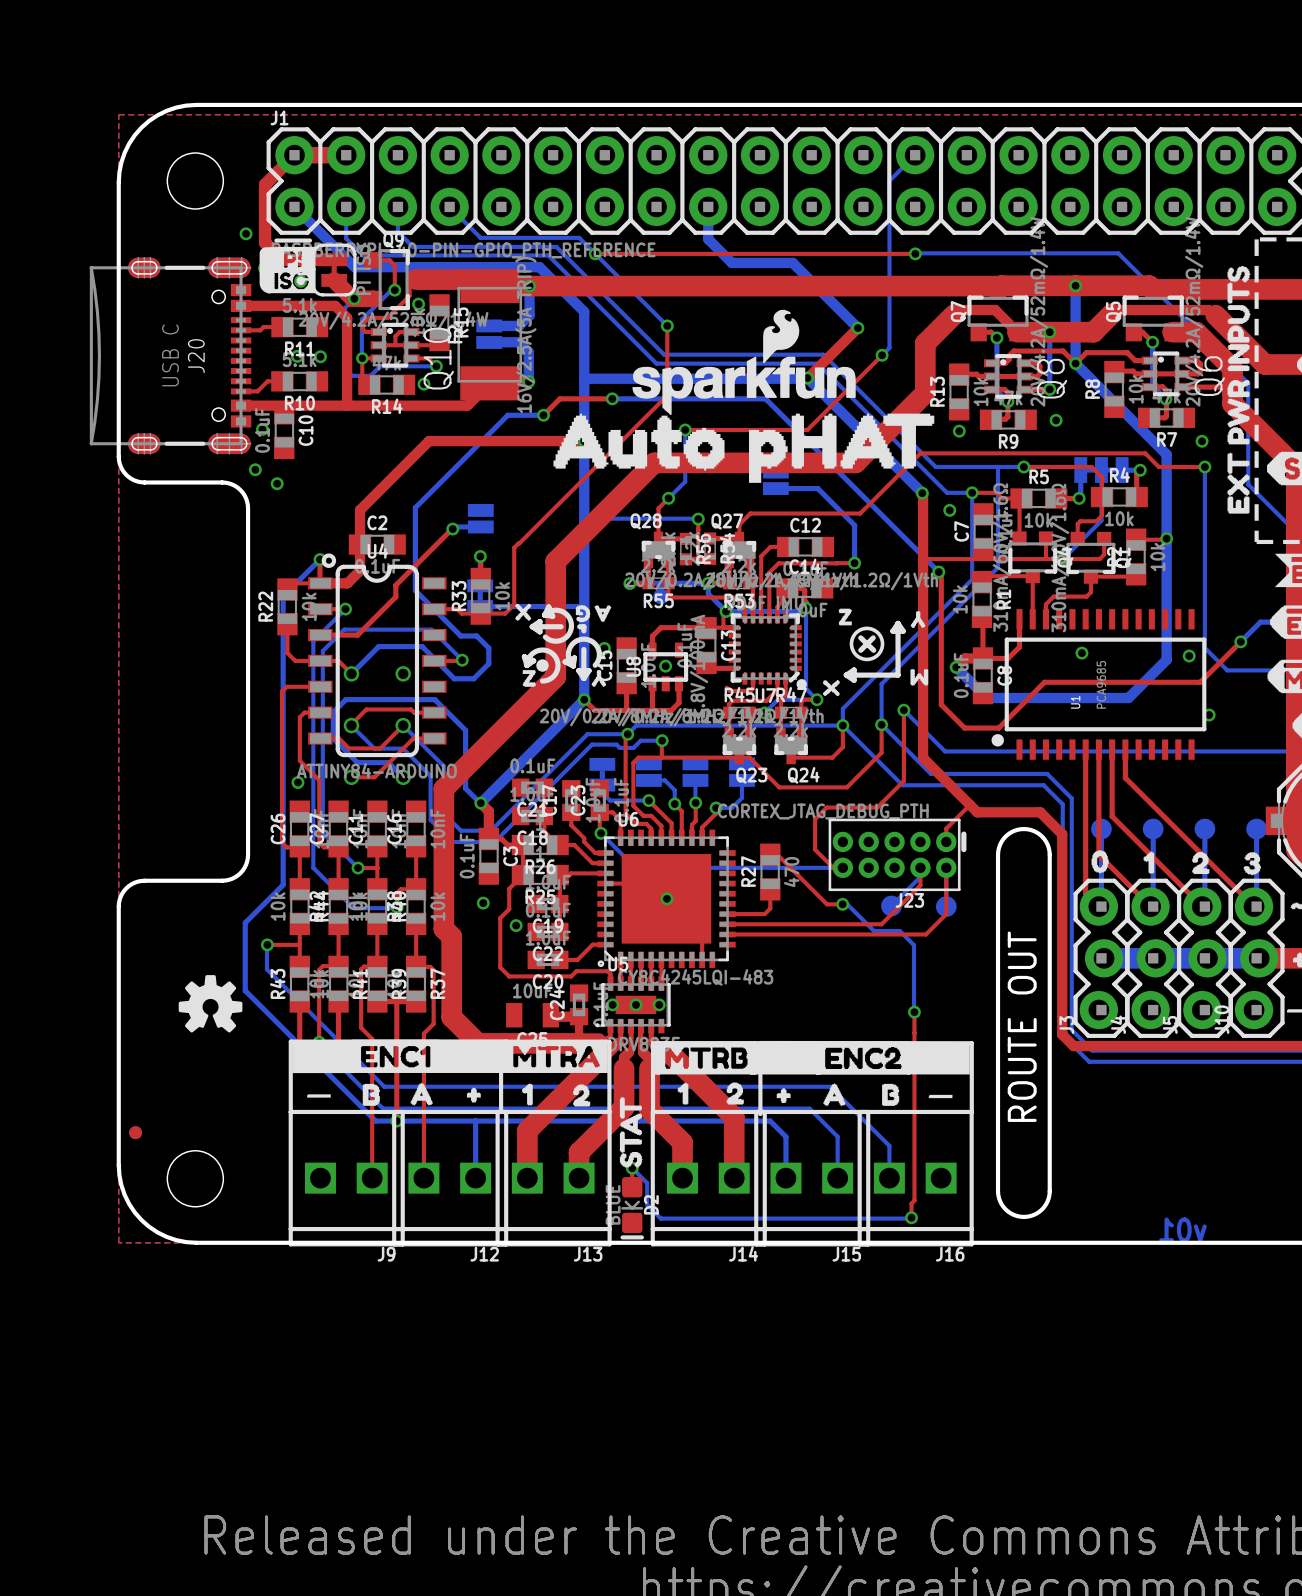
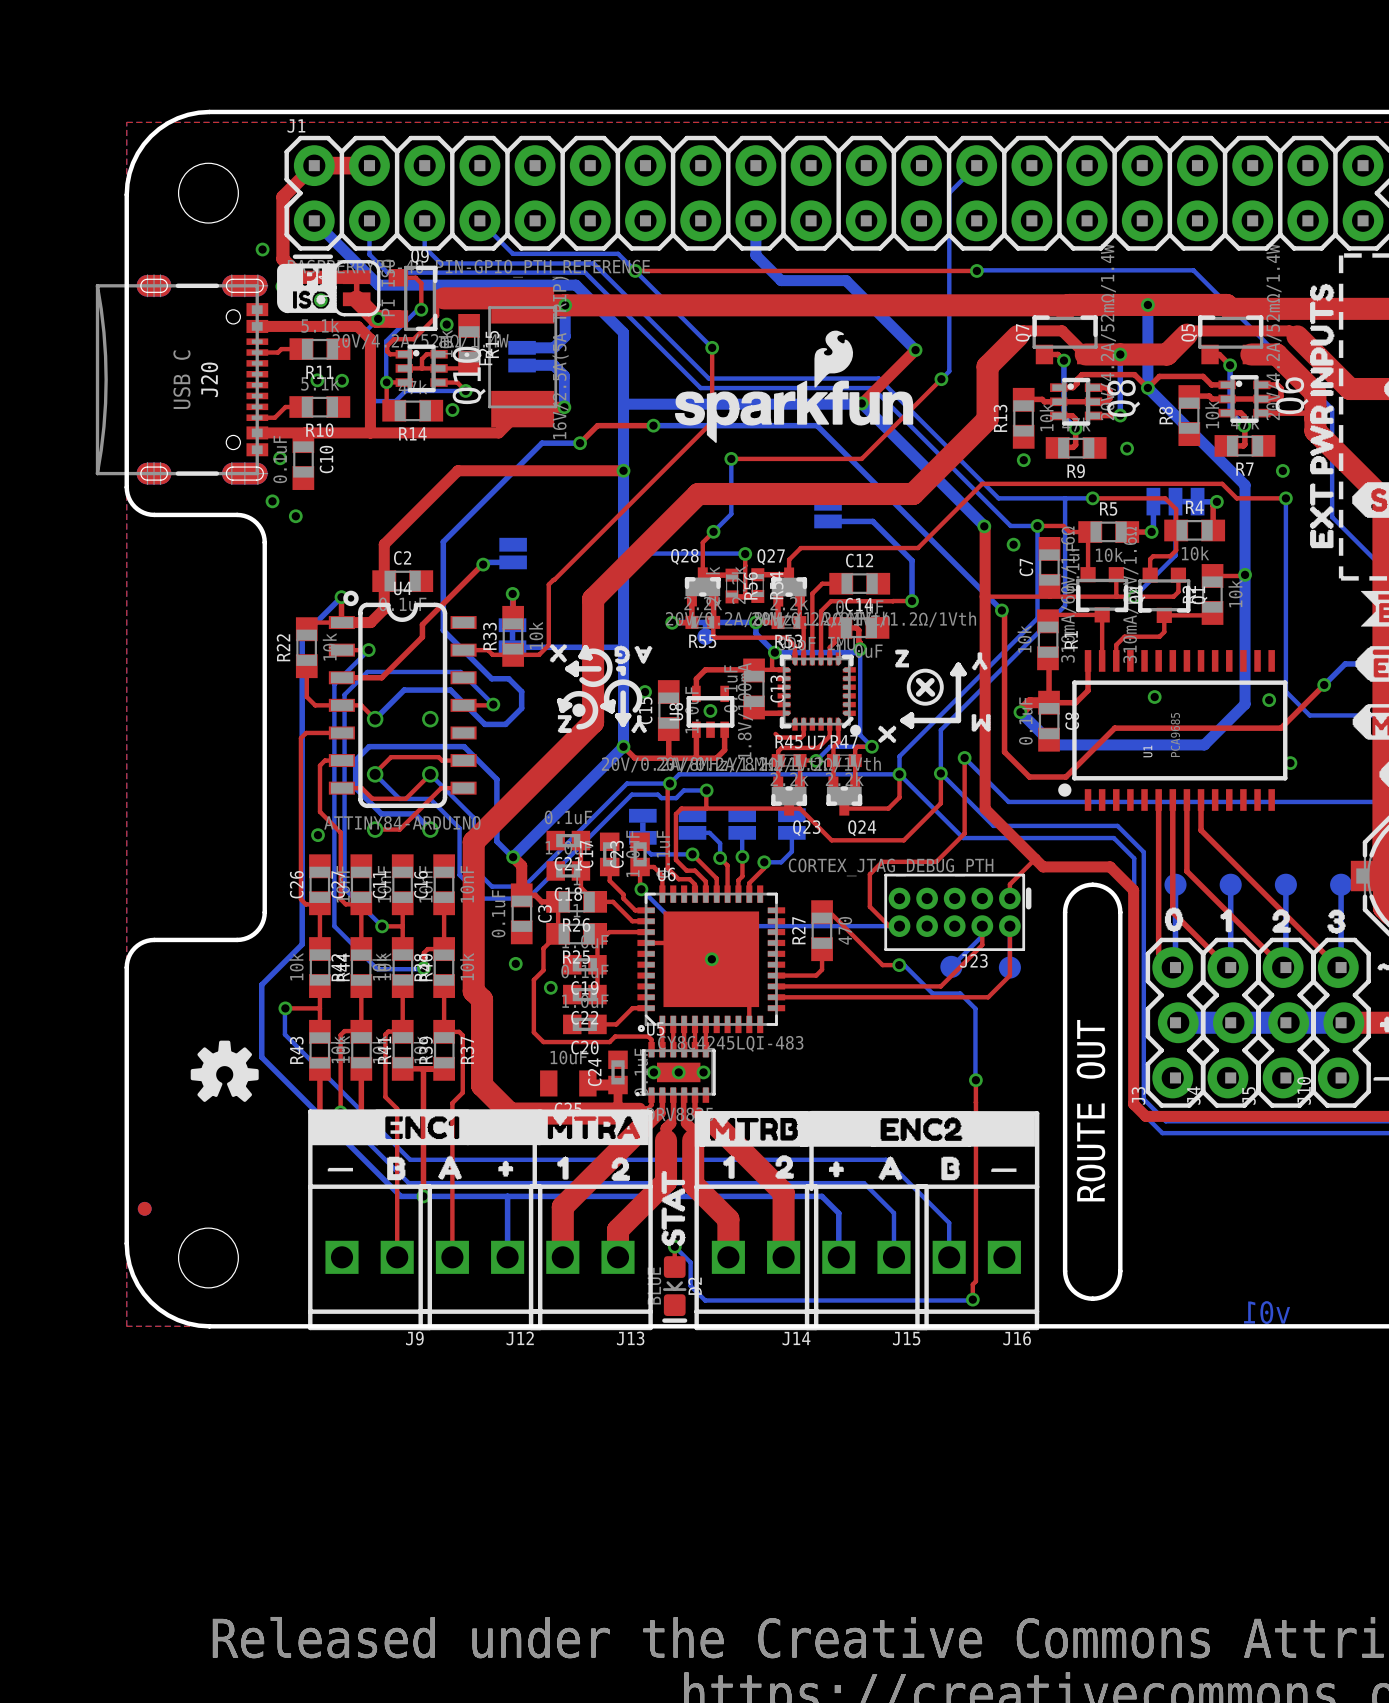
drawing: [553, 413, 935, 483] -> none

